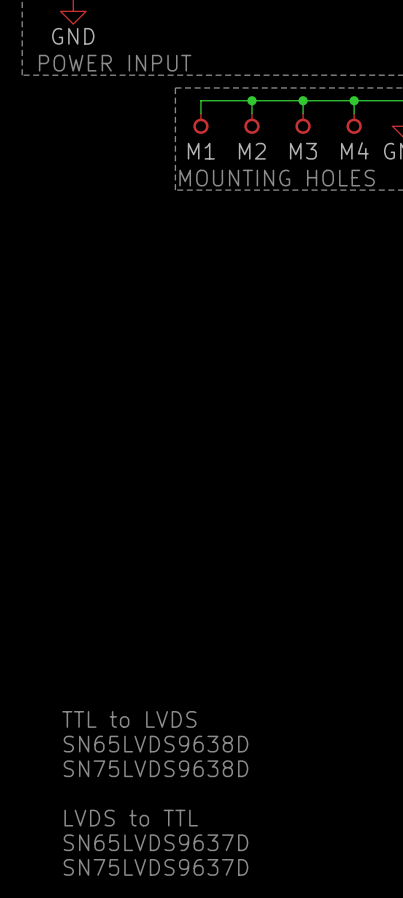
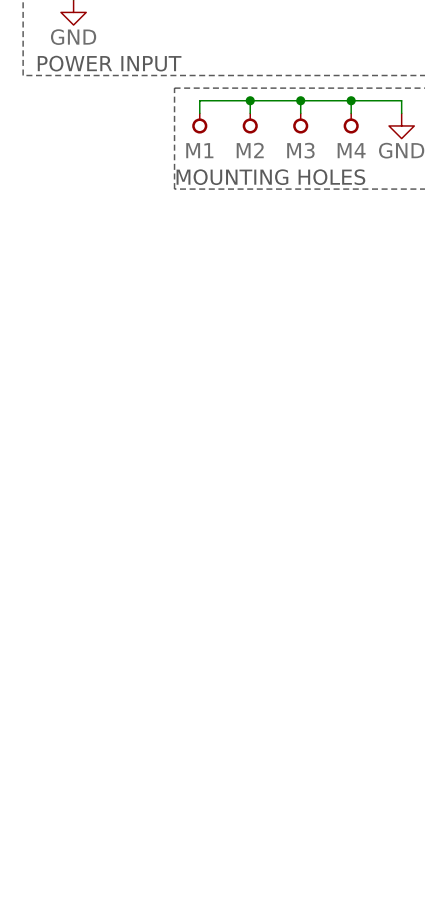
text: TTL to LVDS (129, 719) -> none
text: SN65LVDS9638D (155, 744) -> none
text: SN75LVDS9638D (155, 768) -> none
text: LVDS to TTL (131, 818) -> none
text: SN65LVDS9637D (155, 842) -> none
text: SN75LVDS9637D (155, 867) -> none

